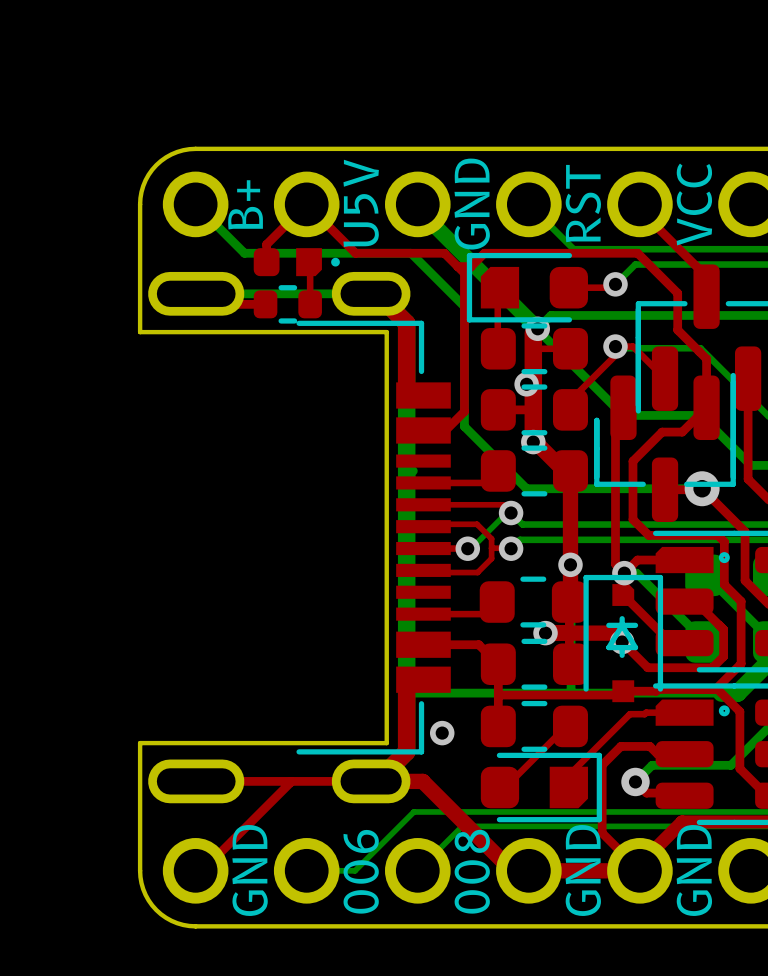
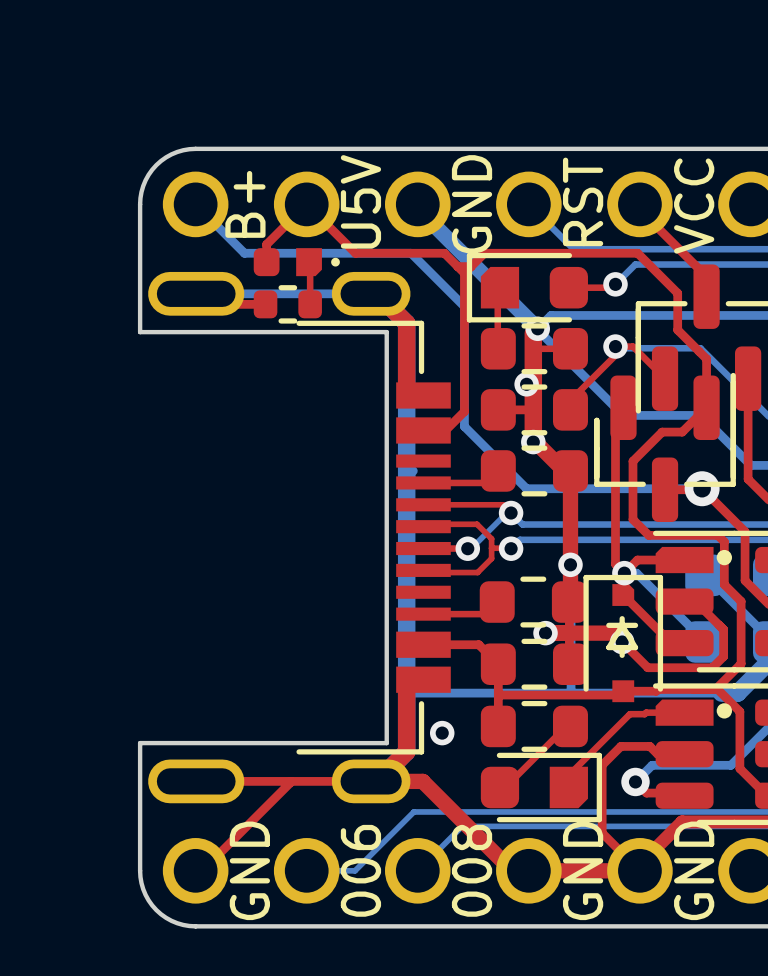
drawing shape: [718, 552, 730, 564] -> [716, 549, 733, 566]
drawing shape: [718, 705, 730, 717] -> [716, 703, 733, 719]

